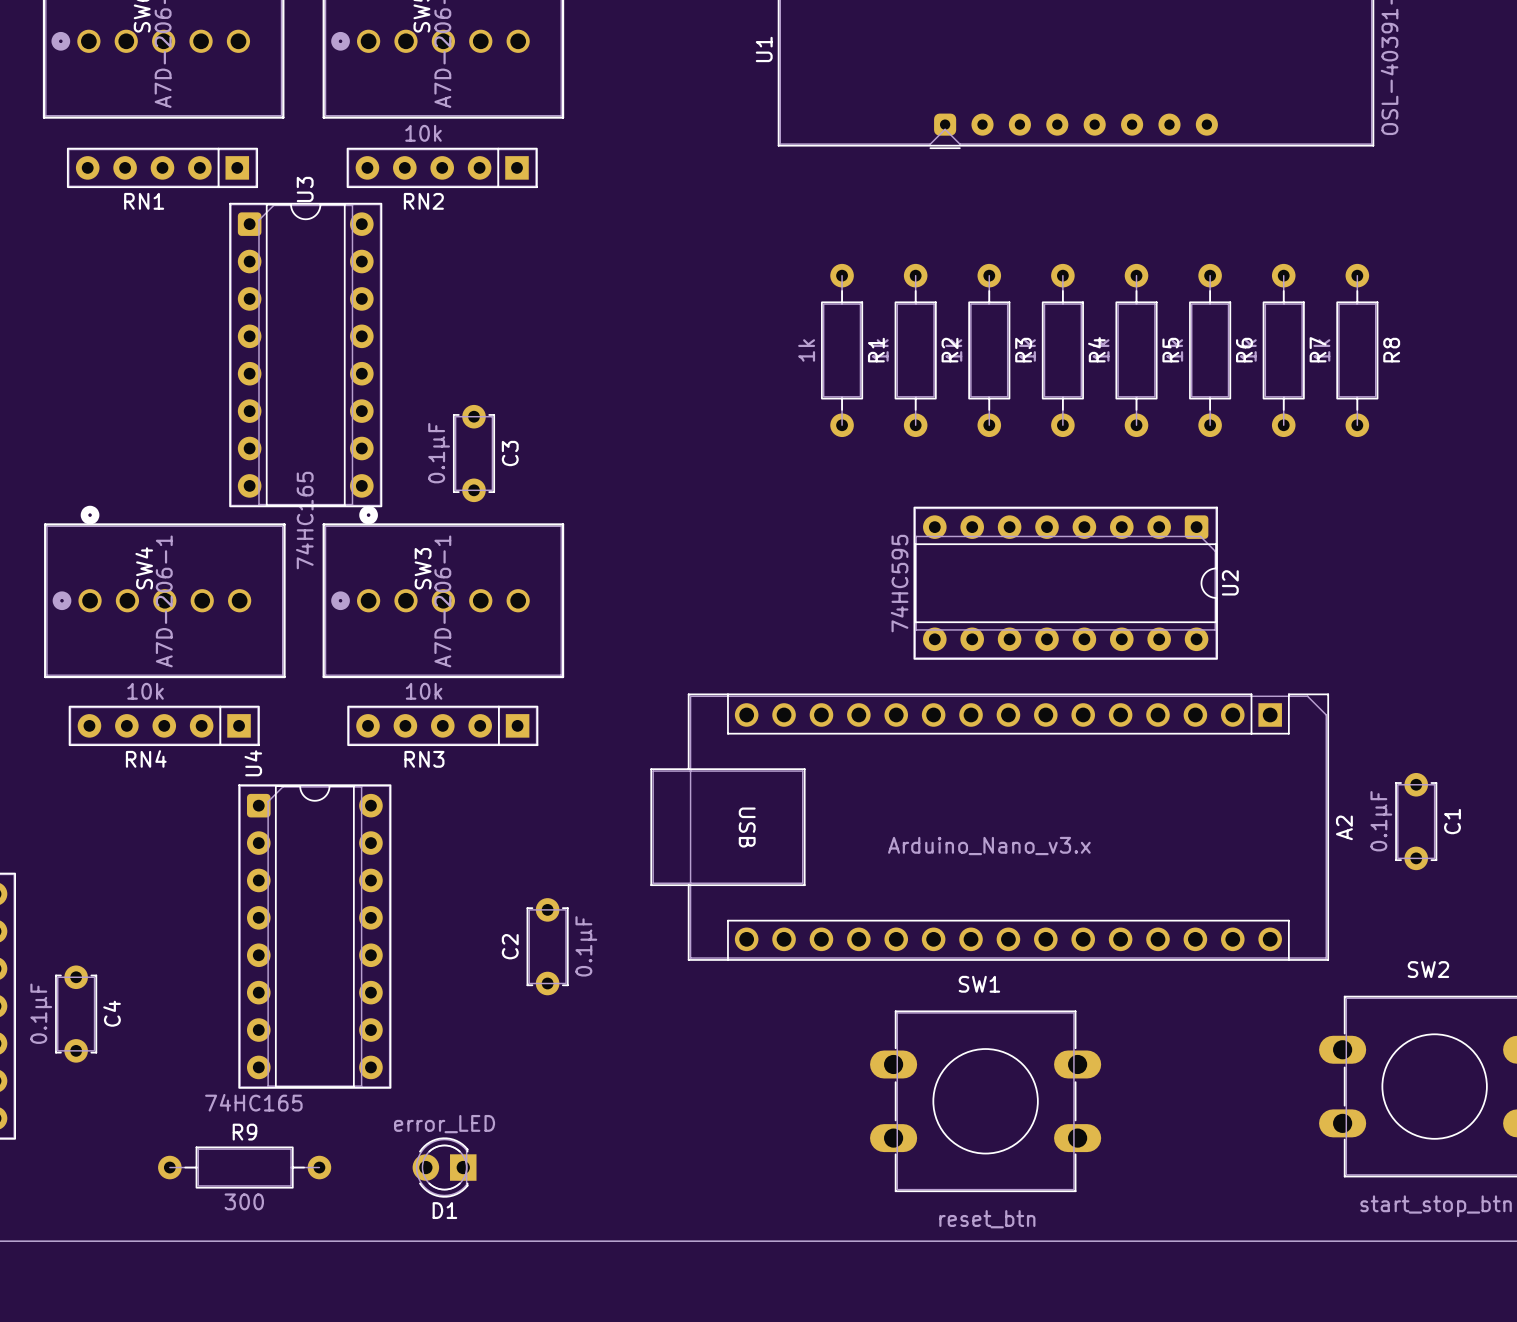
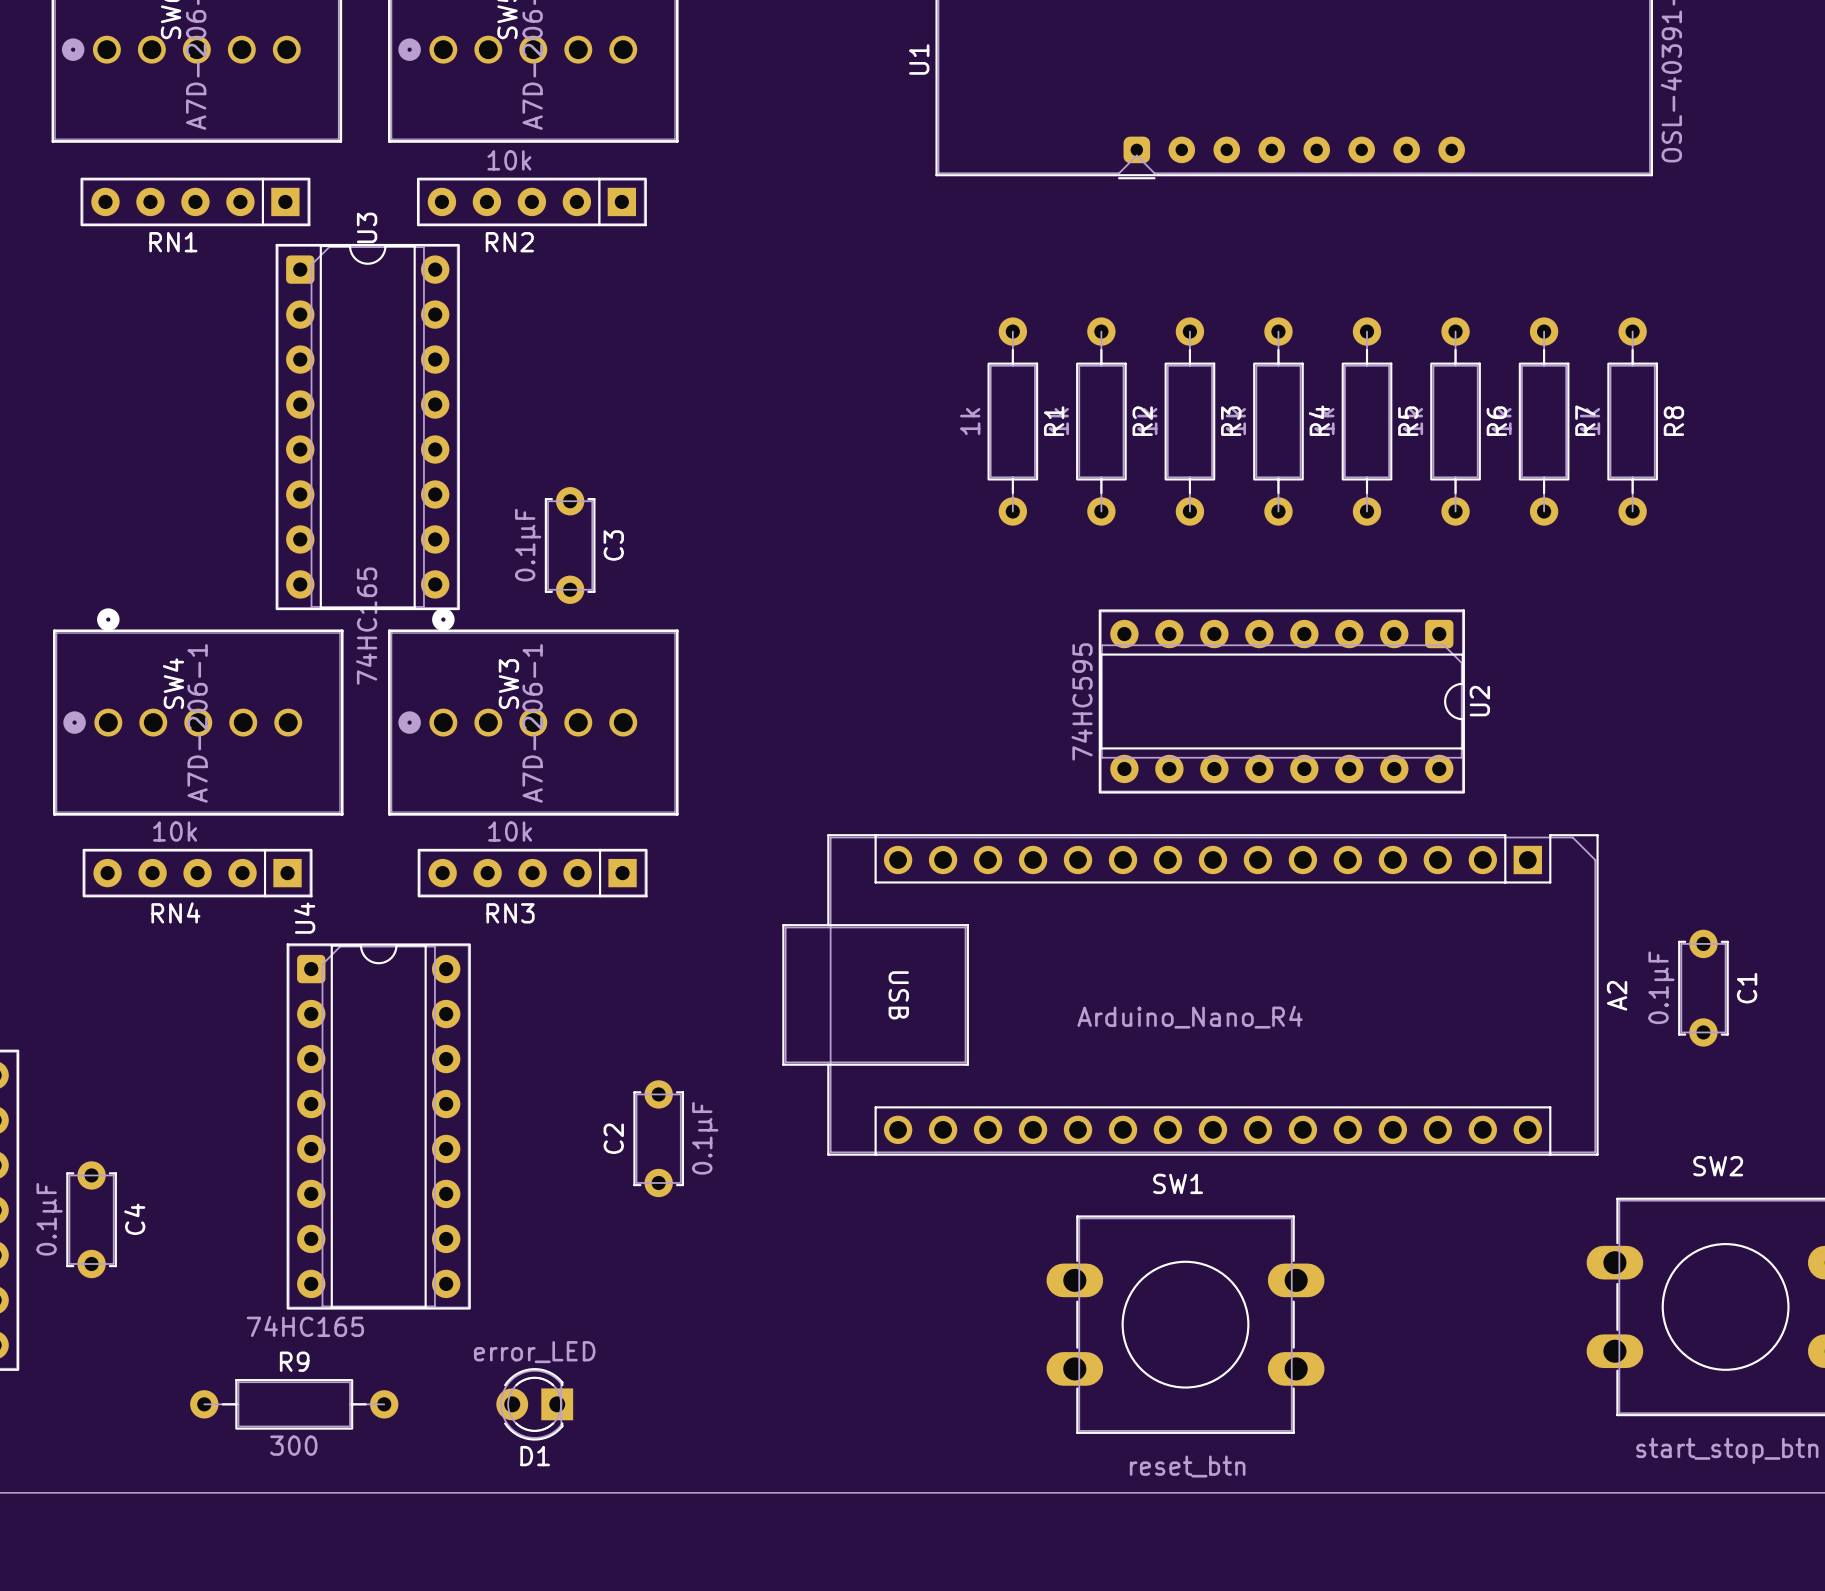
A2 value: Arduino_Nano_v3.x (989, 846) -> Arduino_Nano_R4 (1190, 1017)

